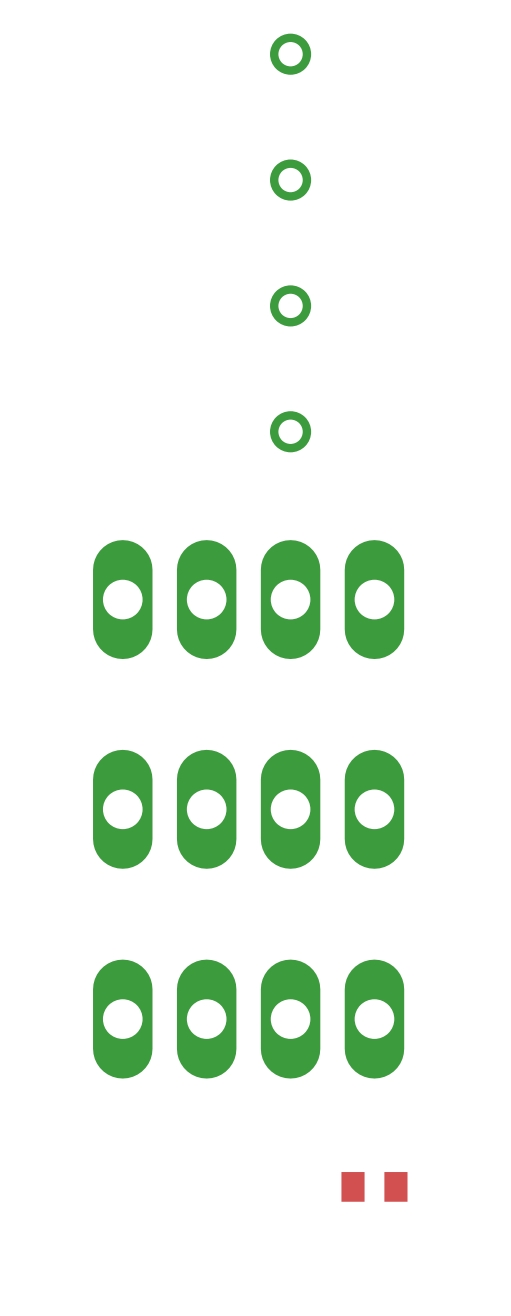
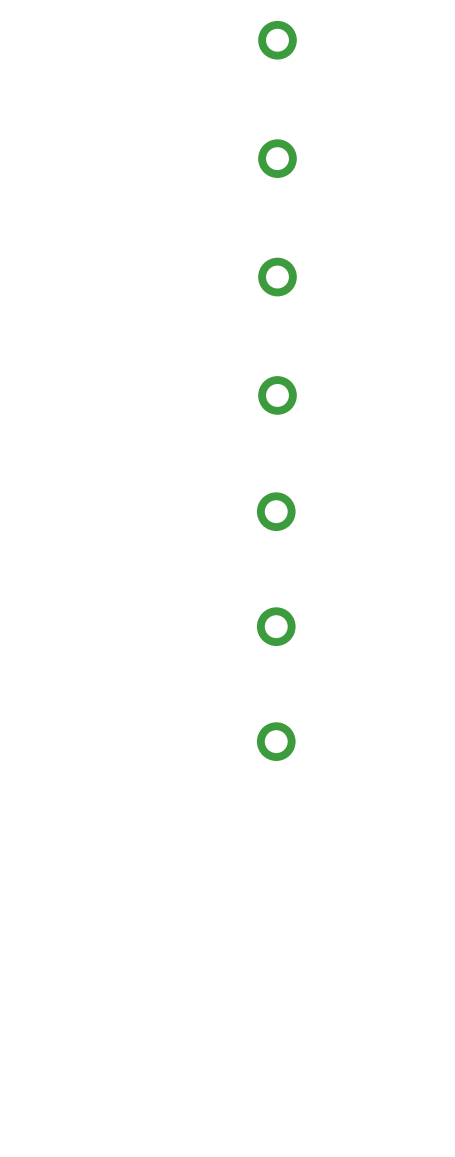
part: none -> (276, 511)
part: (248, 599) -> none
part: none -> (276, 626)
part: none -> (276, 741)
part: (248, 809) -> none
part: (248, 1019) -> none
part: (374, 1186) -> none

